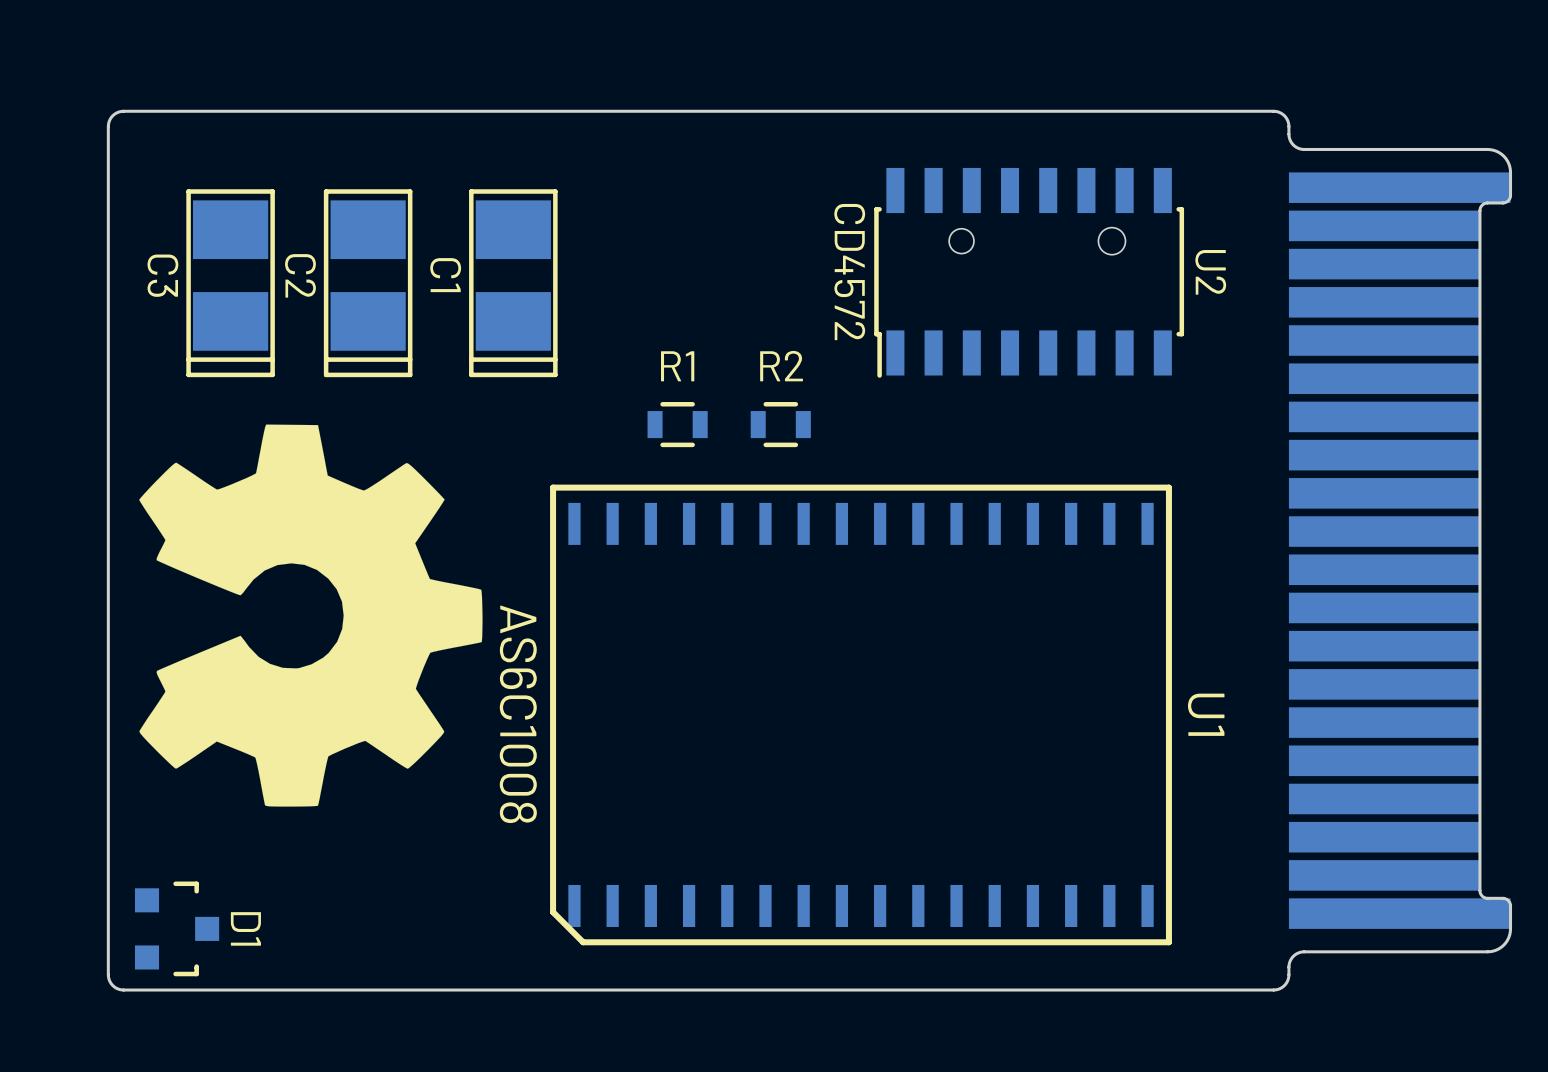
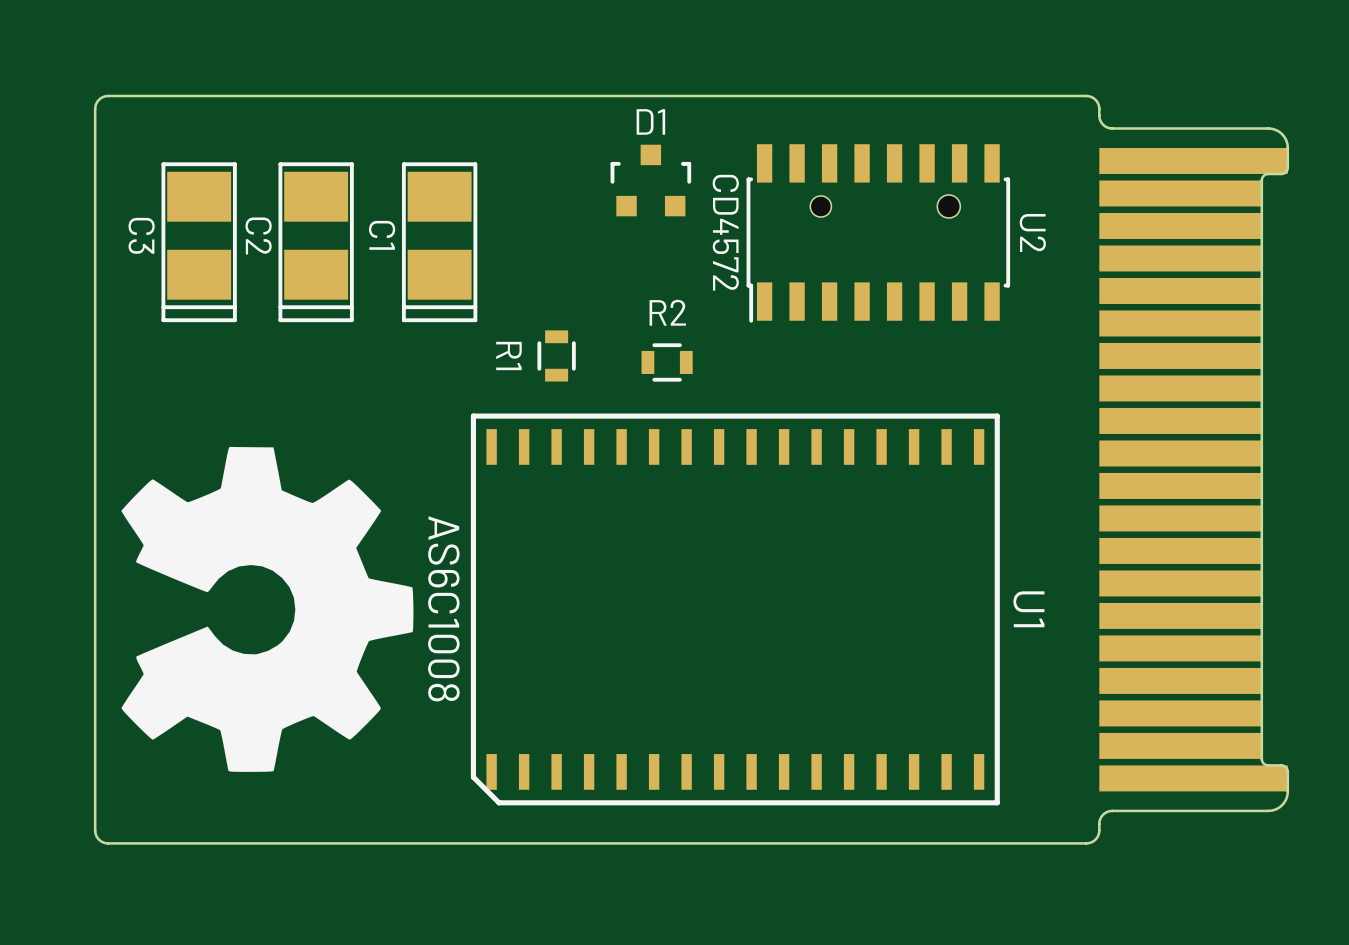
R1 name position: R1 (677, 366) -> R1 (508, 355)
R1 rotation: 0° (677, 424) -> 90° clockwise (556, 355)
drawing position: (310, 615) -> (267, 609)
D1 rotation: 0° (177, 928) -> 90° counterclockwise (650, 180)
D1 position: (177, 928) -> (650, 180)

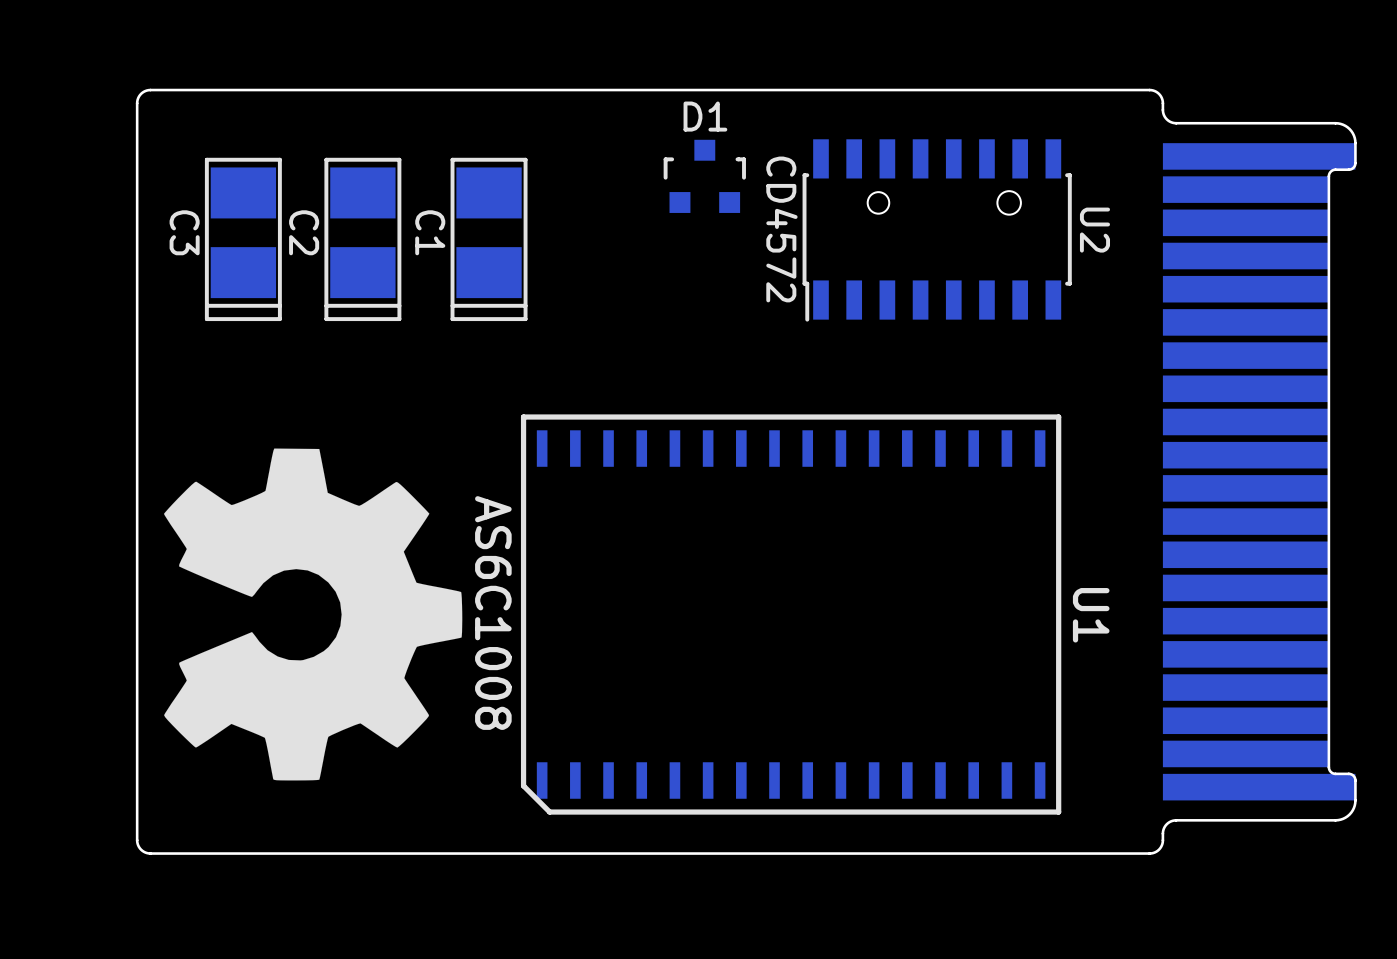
R1: (556, 355) -> none
R2: (667, 362) -> none

